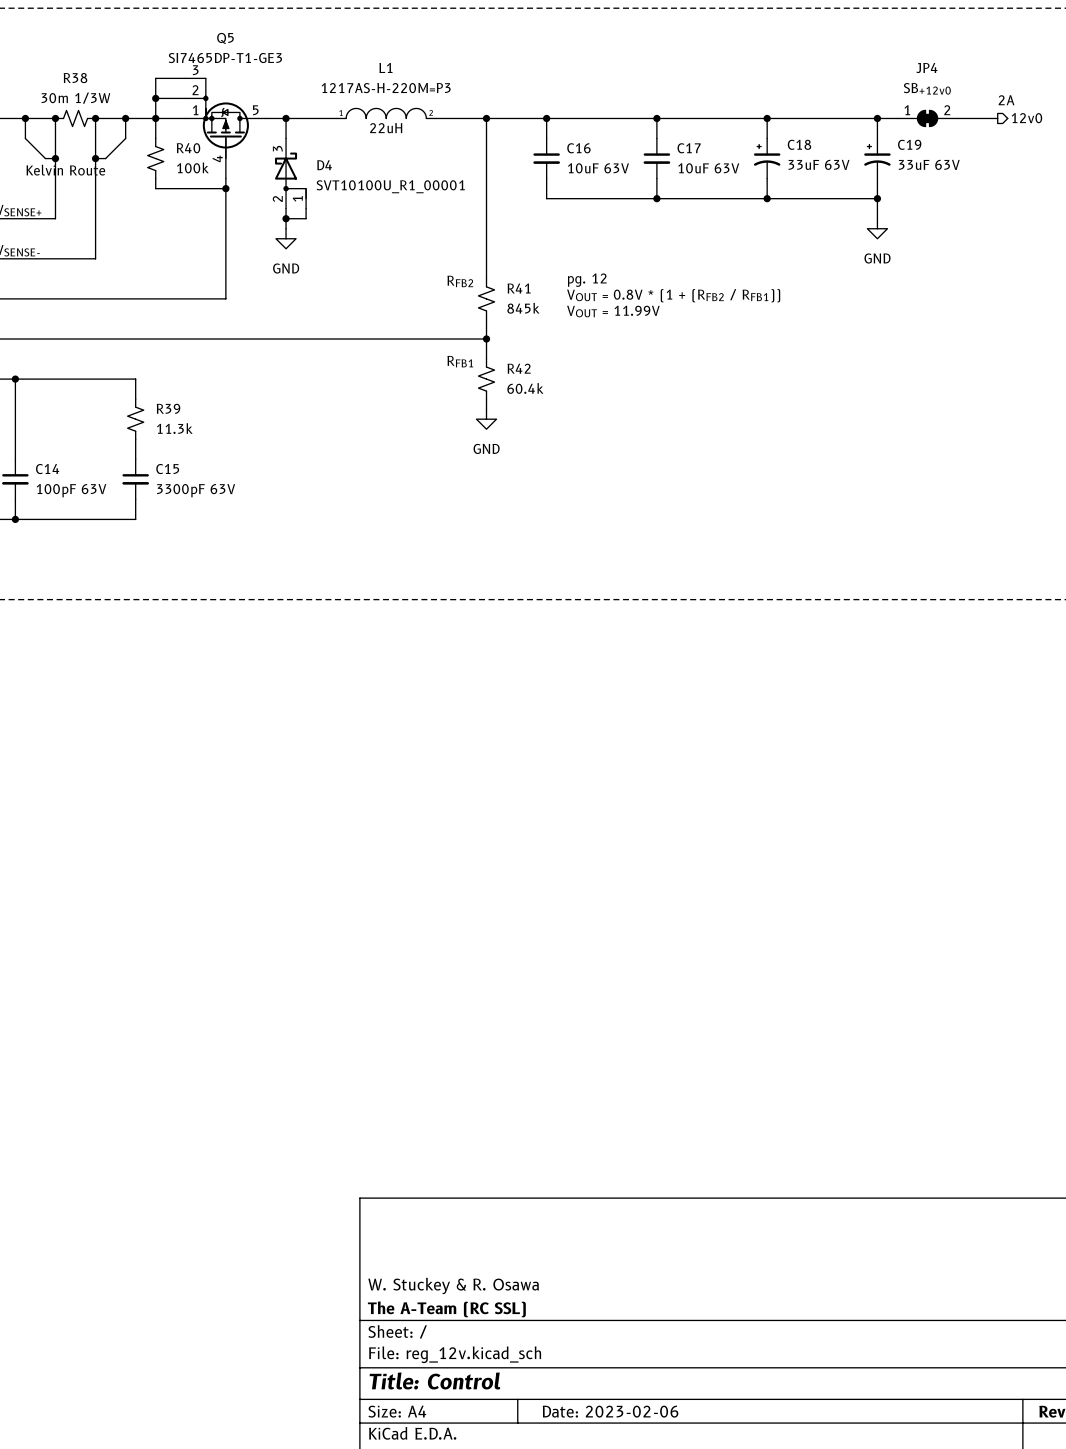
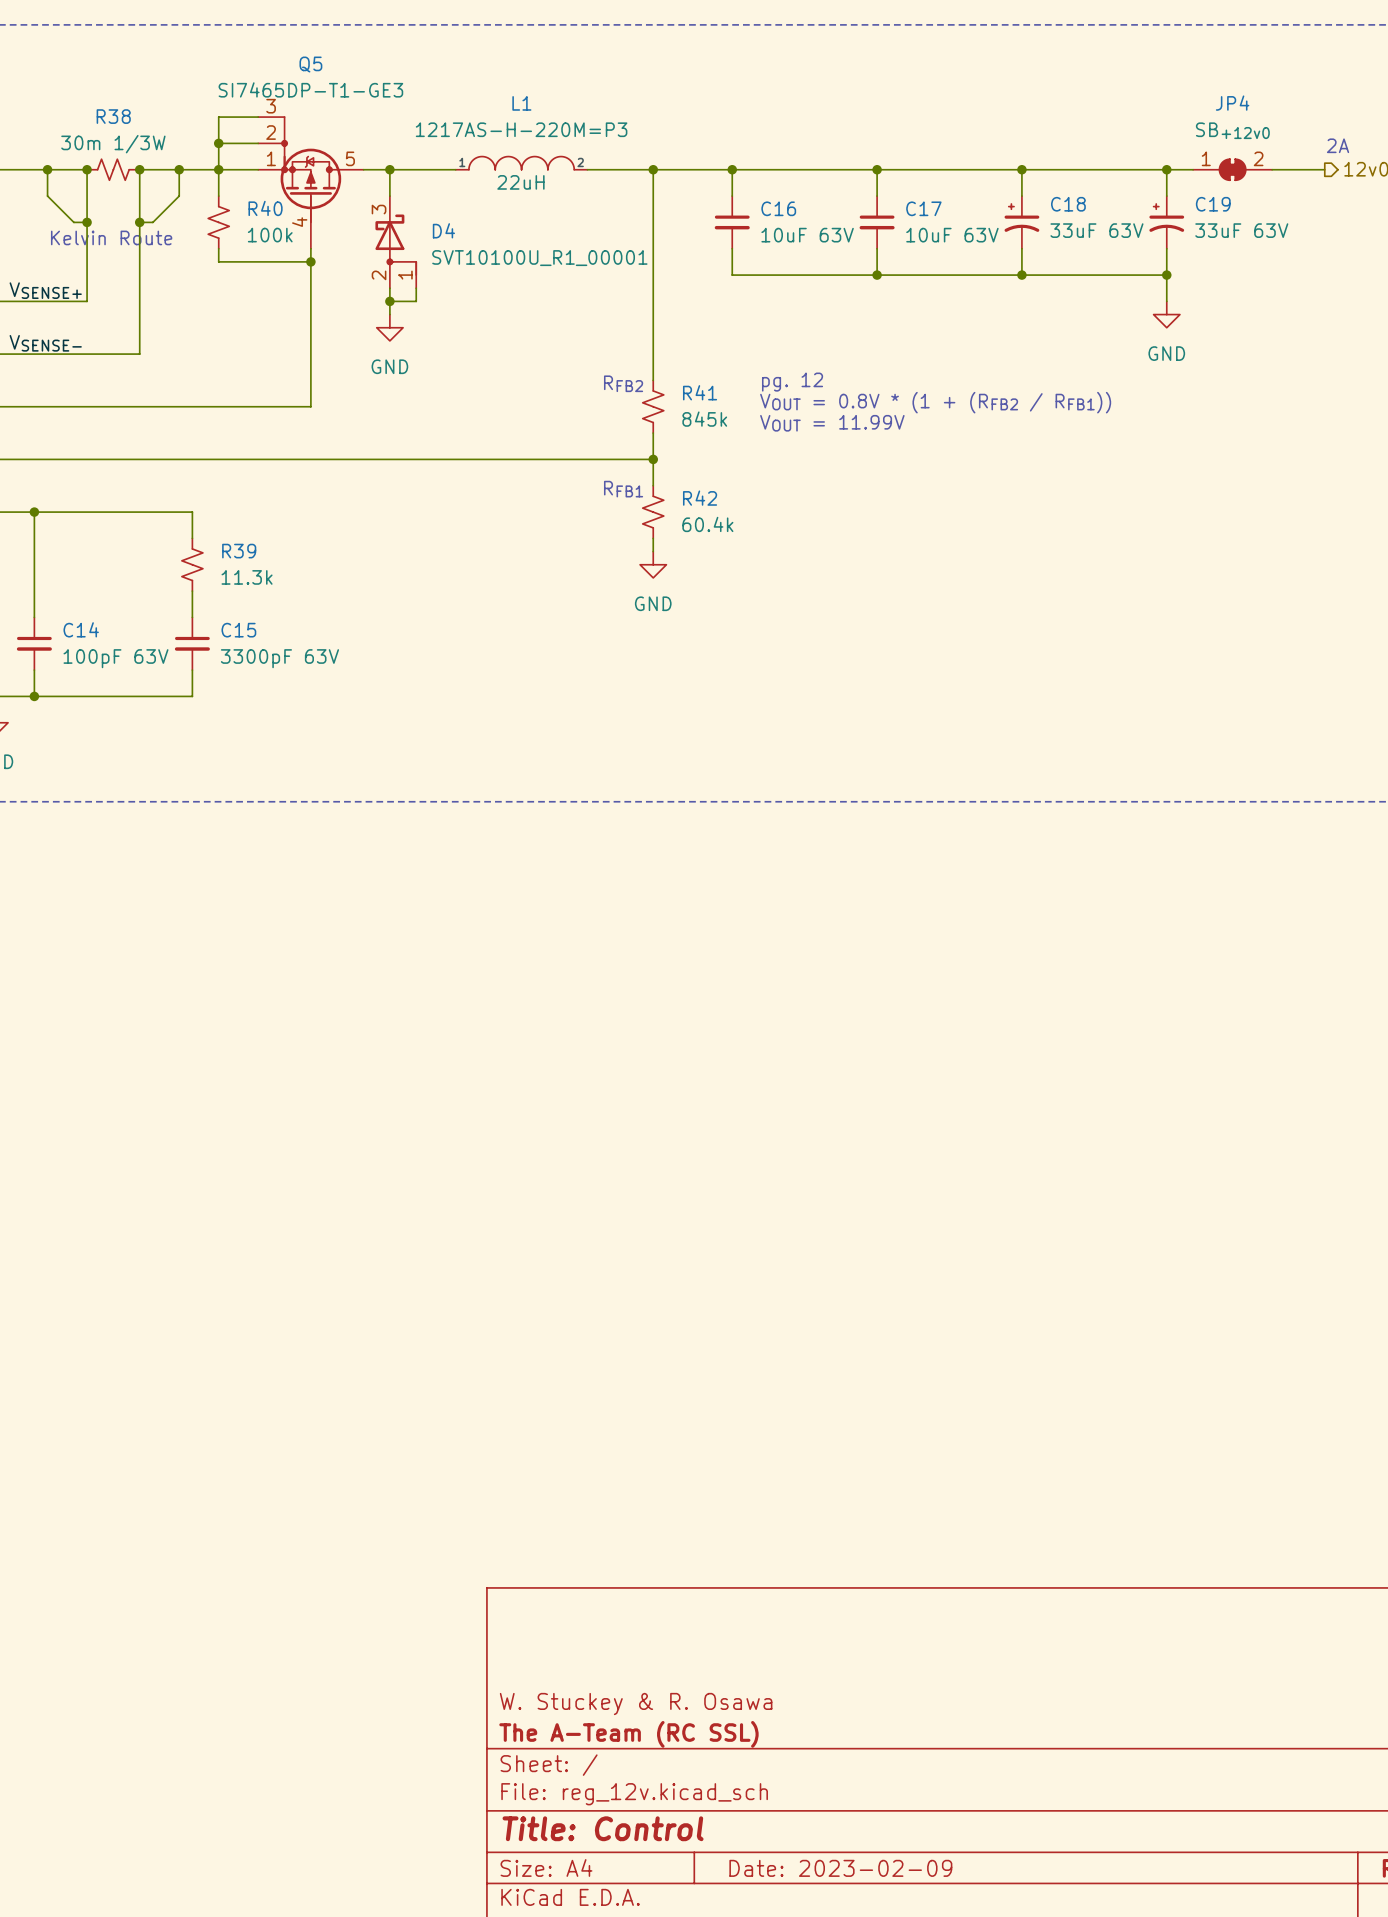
title block: Date: 2023-02-06 (610, 1411) -> Date: 2023-02-09 (840, 1868)

